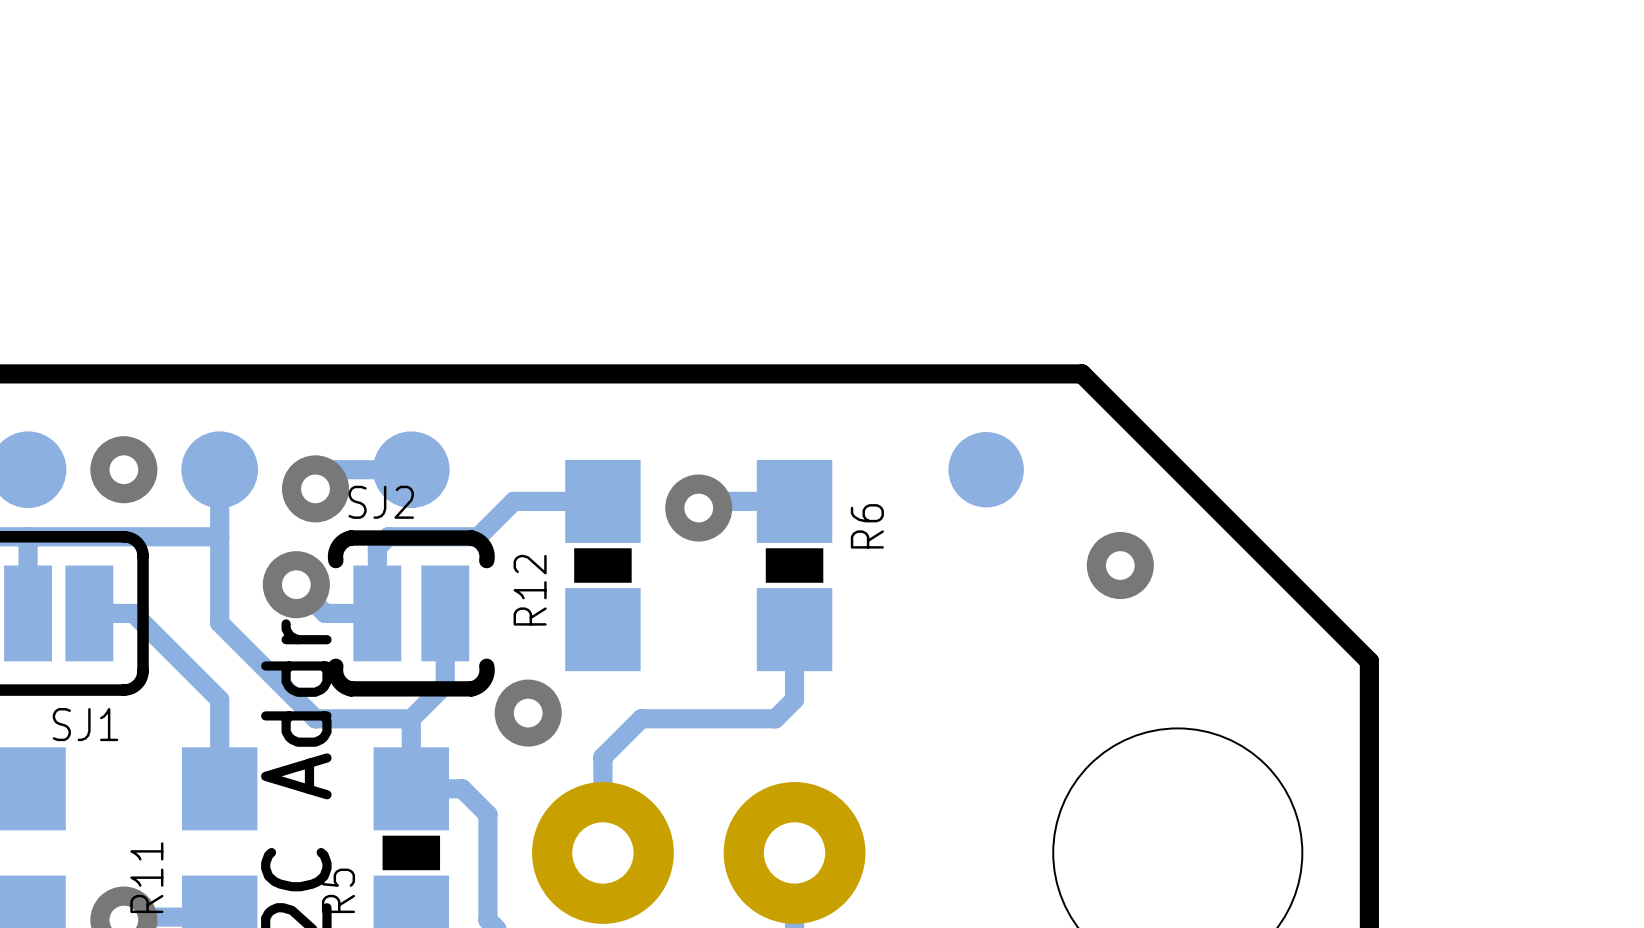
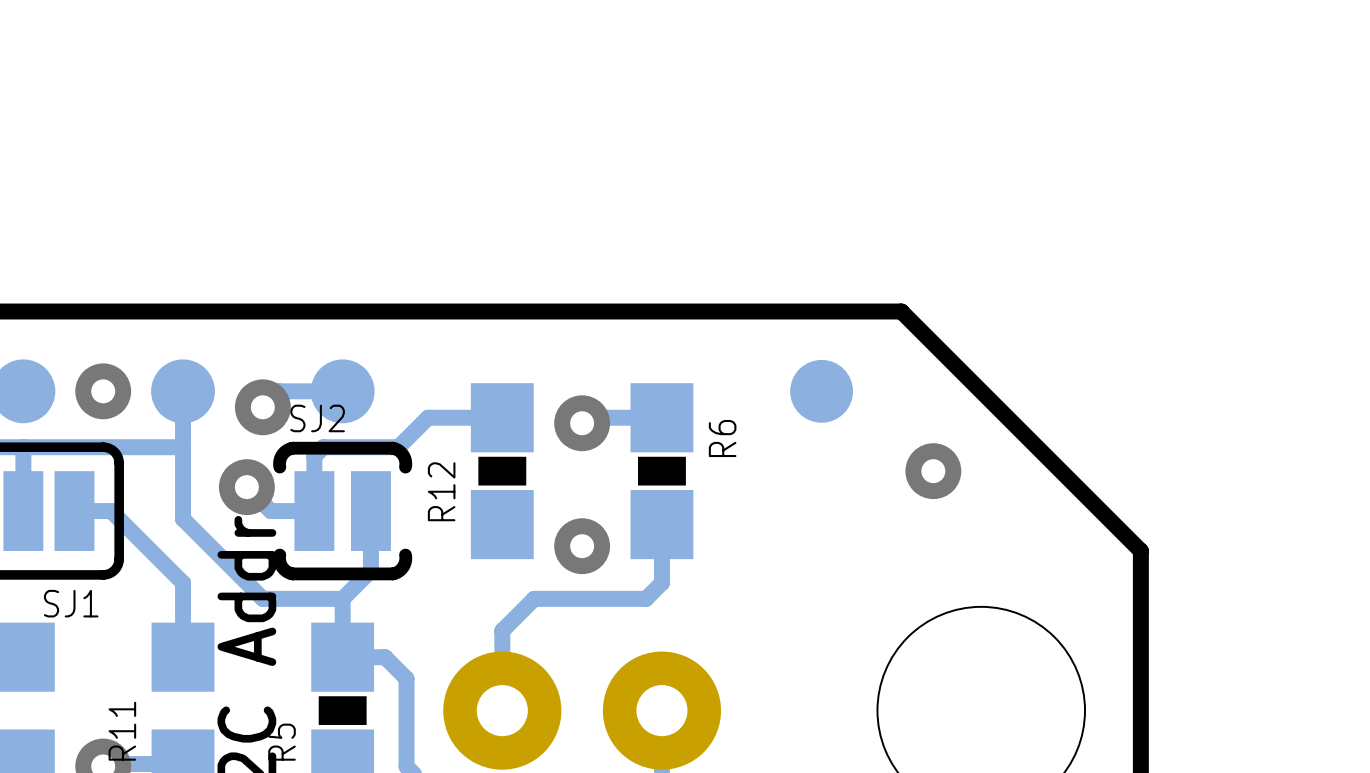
via: none -> (582, 546)
via: (528, 713) -> none

